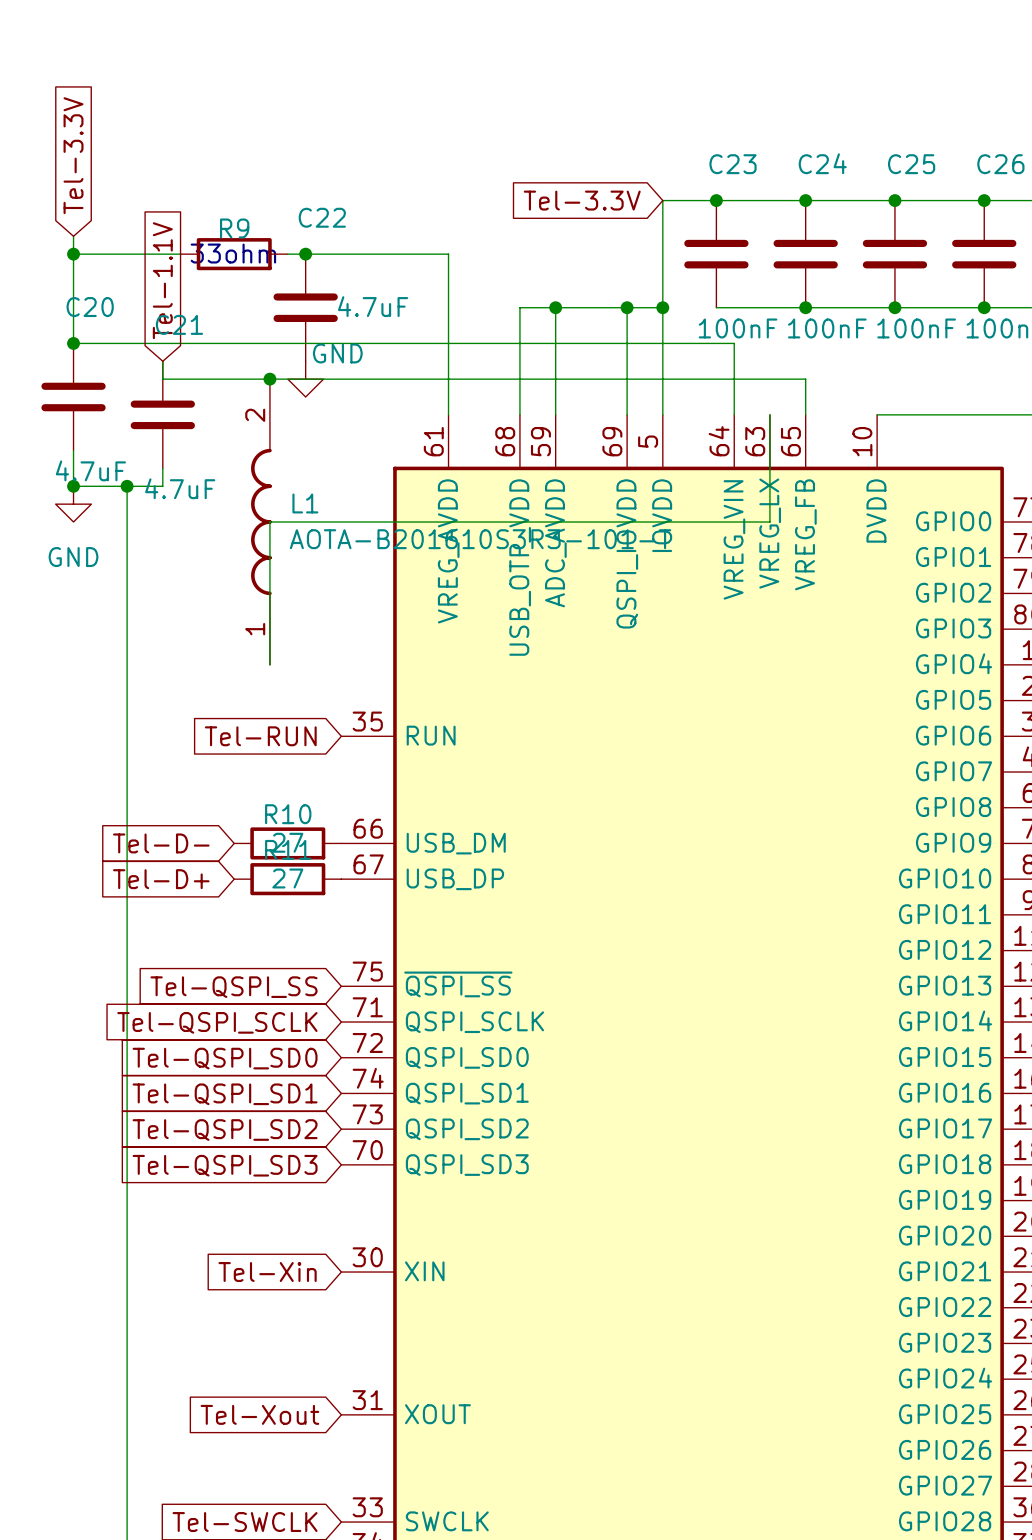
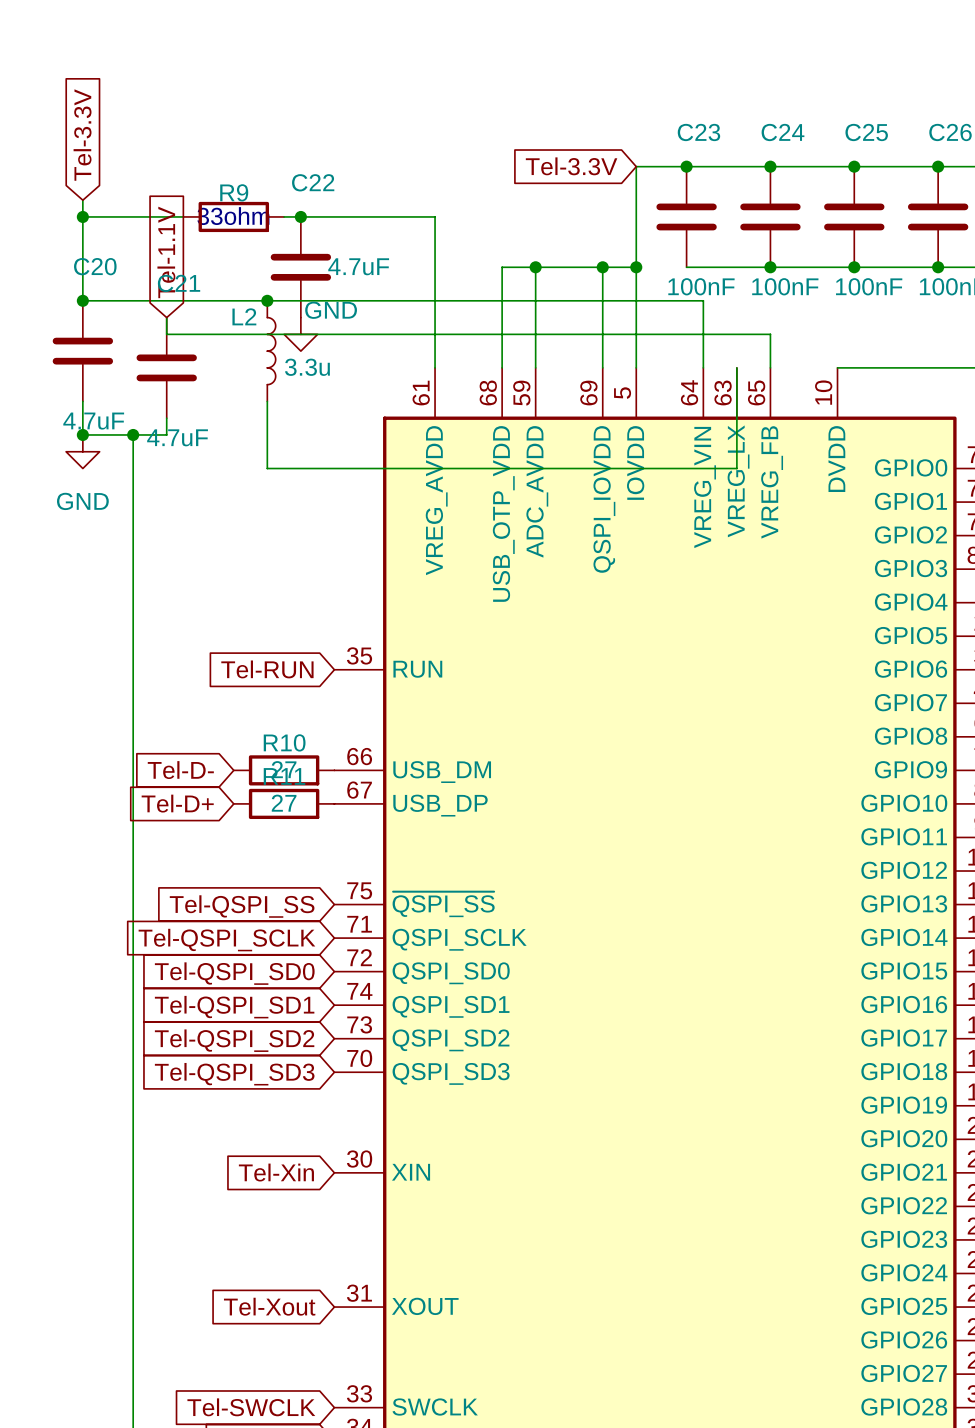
junction position: (269, 379) -> (267, 300)
L2: none -> 3.3u (271, 351)
L1: AOTA-B201610S3R3-101-T (261, 522) -> none
wire: (269, 522) (269, 664) -> (267, 468) (267, 401)

